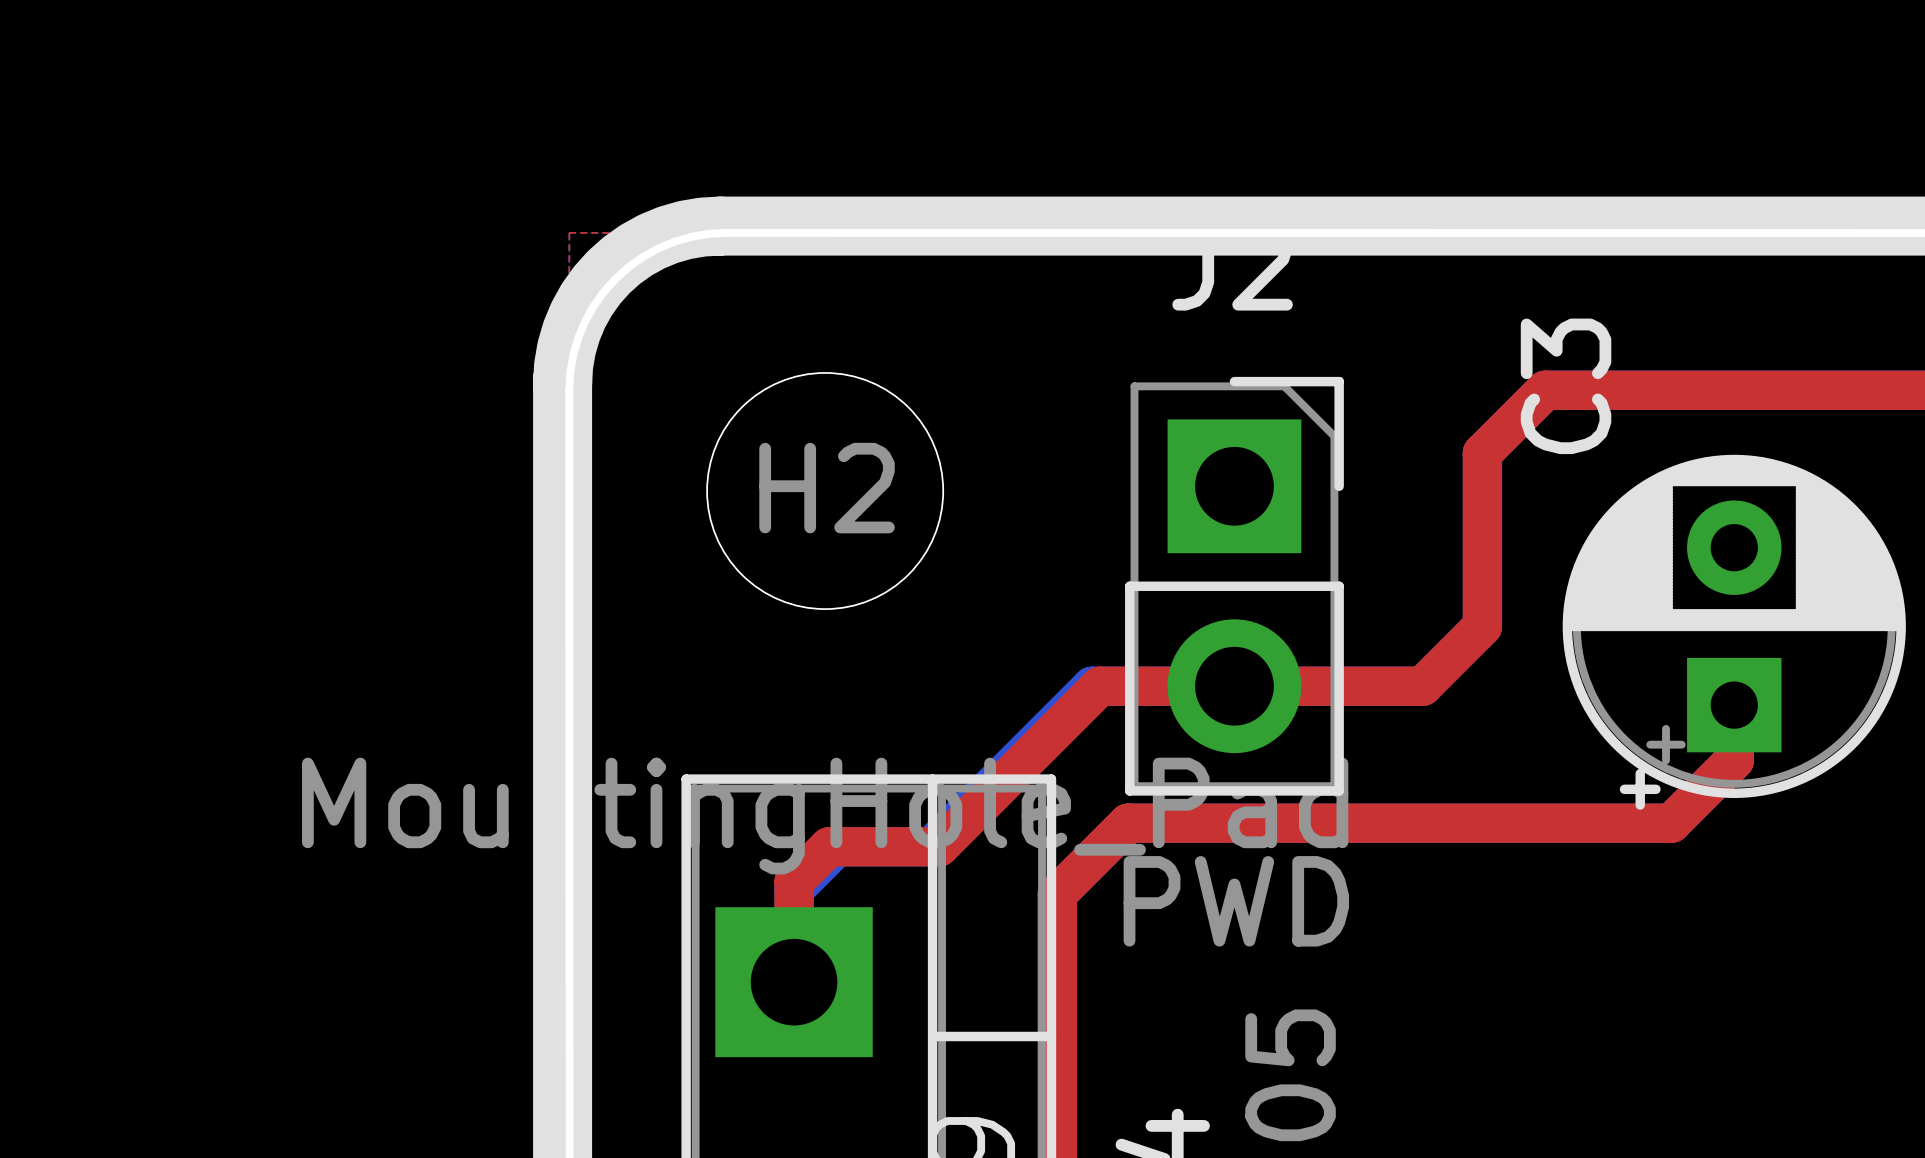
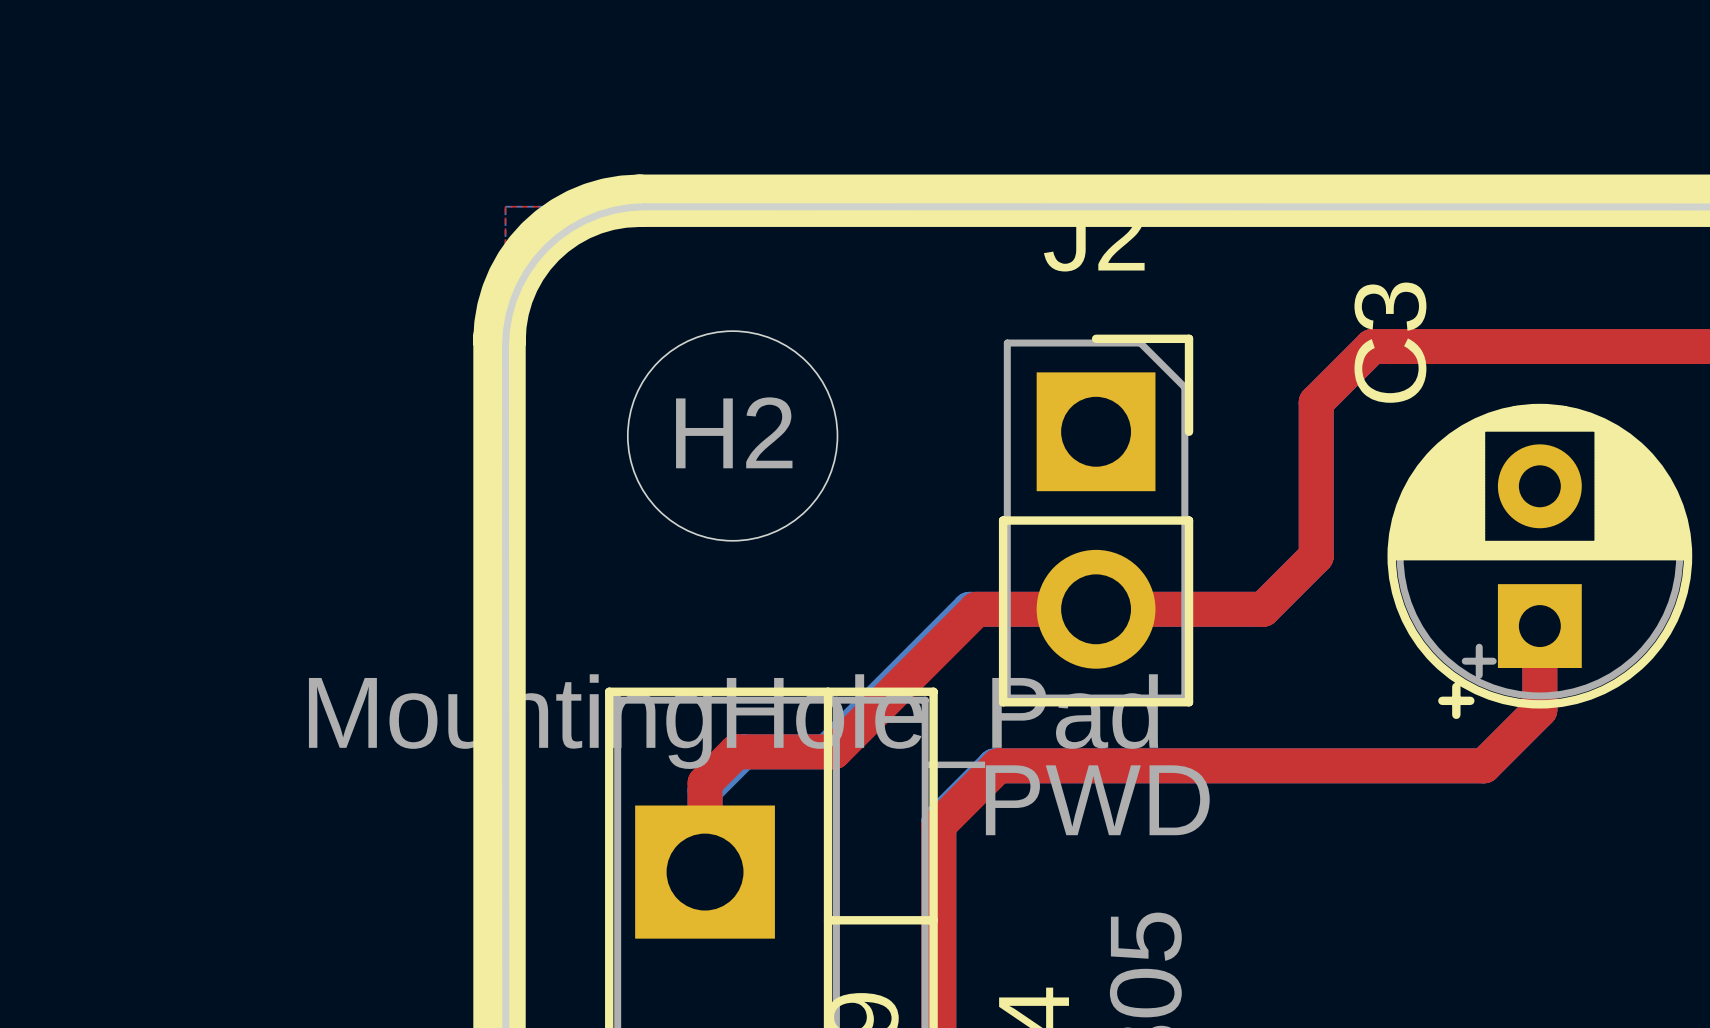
top track: (1734, 760) (1671, 823) (1128, 823) (1057, 894) (1057, 929) -> (1539, 674) (1539, 709) (1483, 765) (998, 765) (938, 825)

